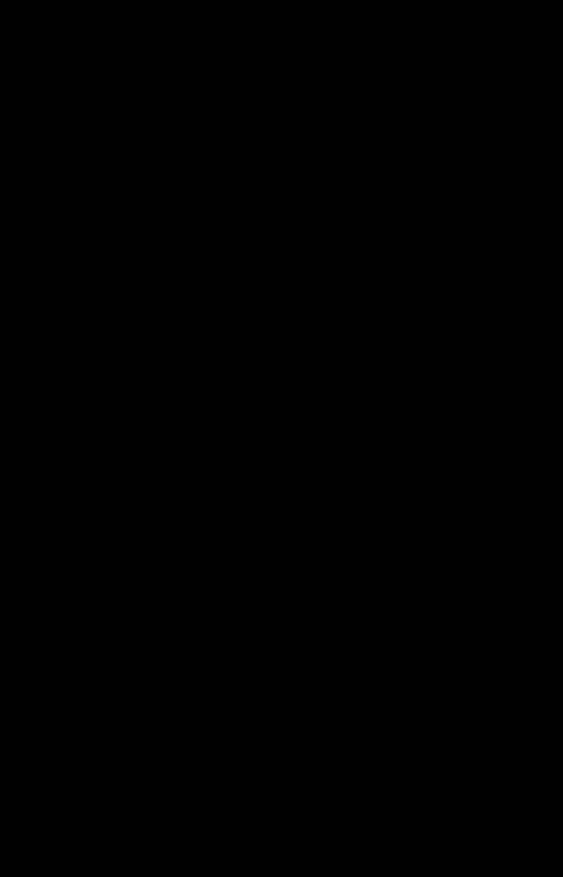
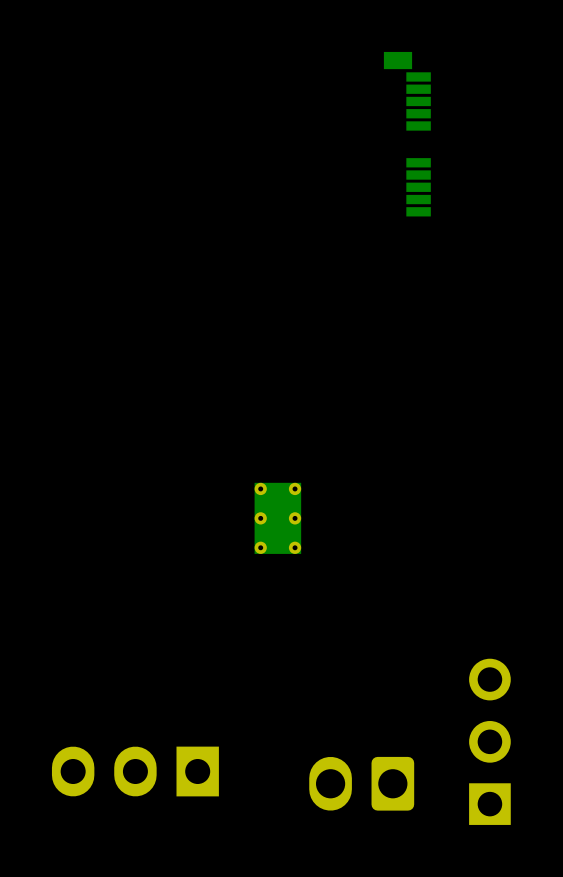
part: none -> (407, 134)
part: none -> (277, 518)
part: none -> (489, 741)
part: none -> (135, 771)
part: none -> (361, 783)

